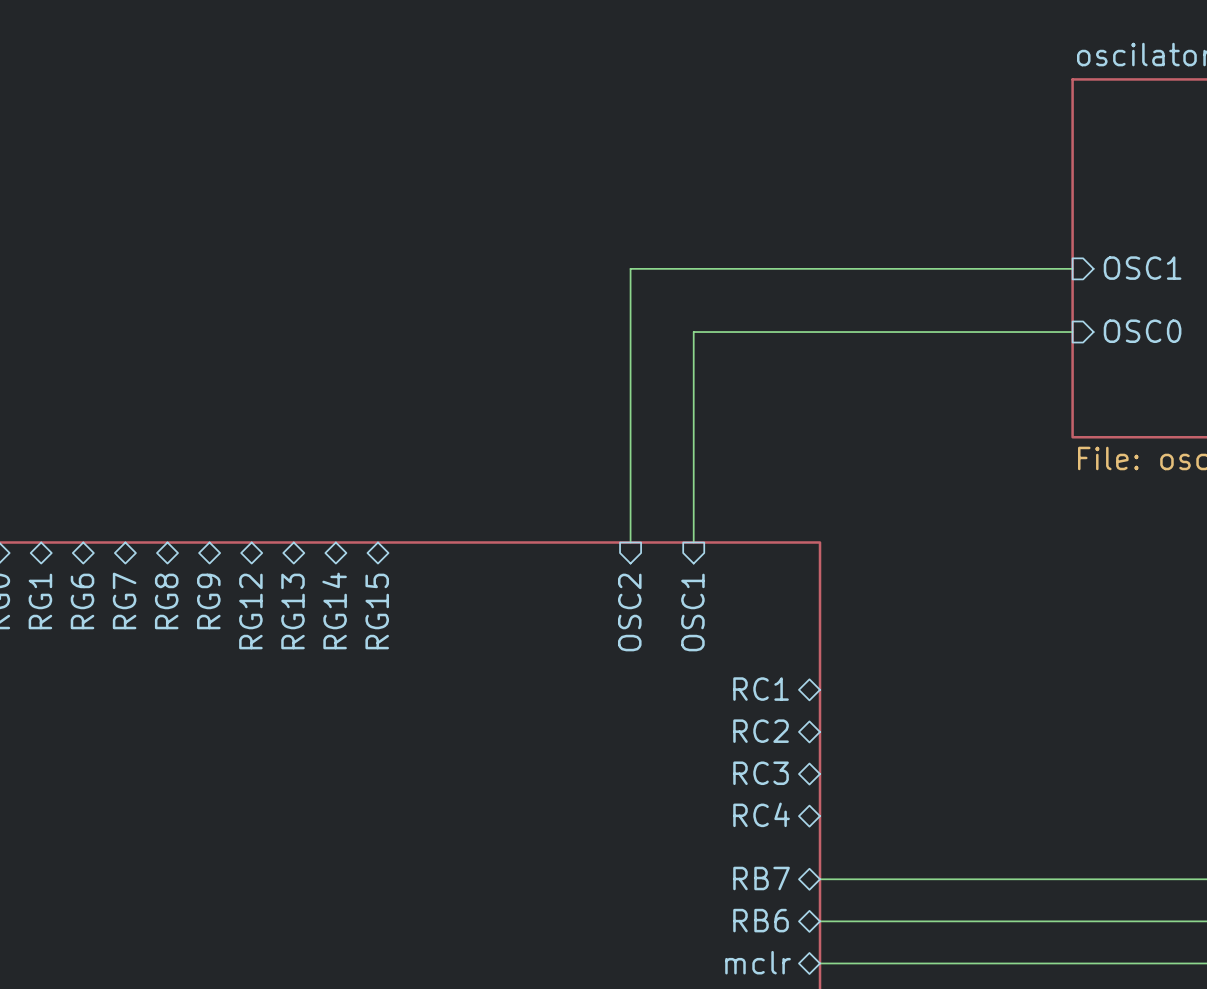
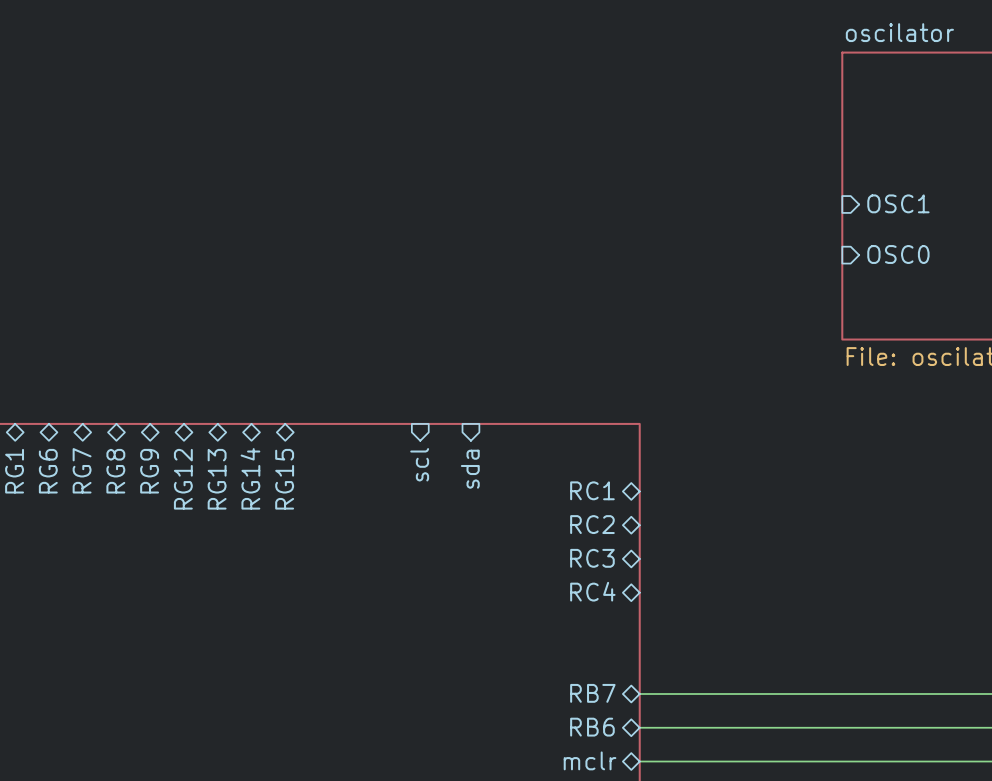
wire: (1072, 268) (630, 268) (630, 542) -> none
wire: (1072, 332) (693, 332) (693, 542) -> none
sheet pin: none -> scl (419, 464)
sheet pin: none -> sda (470, 469)
sheet pin: OSC2 (629, 612) -> none
sheet pin: OSC1 (692, 612) -> none
sheet pin position: RC1 (761, 689) -> RC1 (592, 490)
sheet pin position: RC2 (761, 731) -> RC2 (592, 524)
sheet pin position: RC3 (761, 773) -> RC3 (592, 558)
sheet pin position: RC4 (761, 814) -> RC4 (592, 591)

